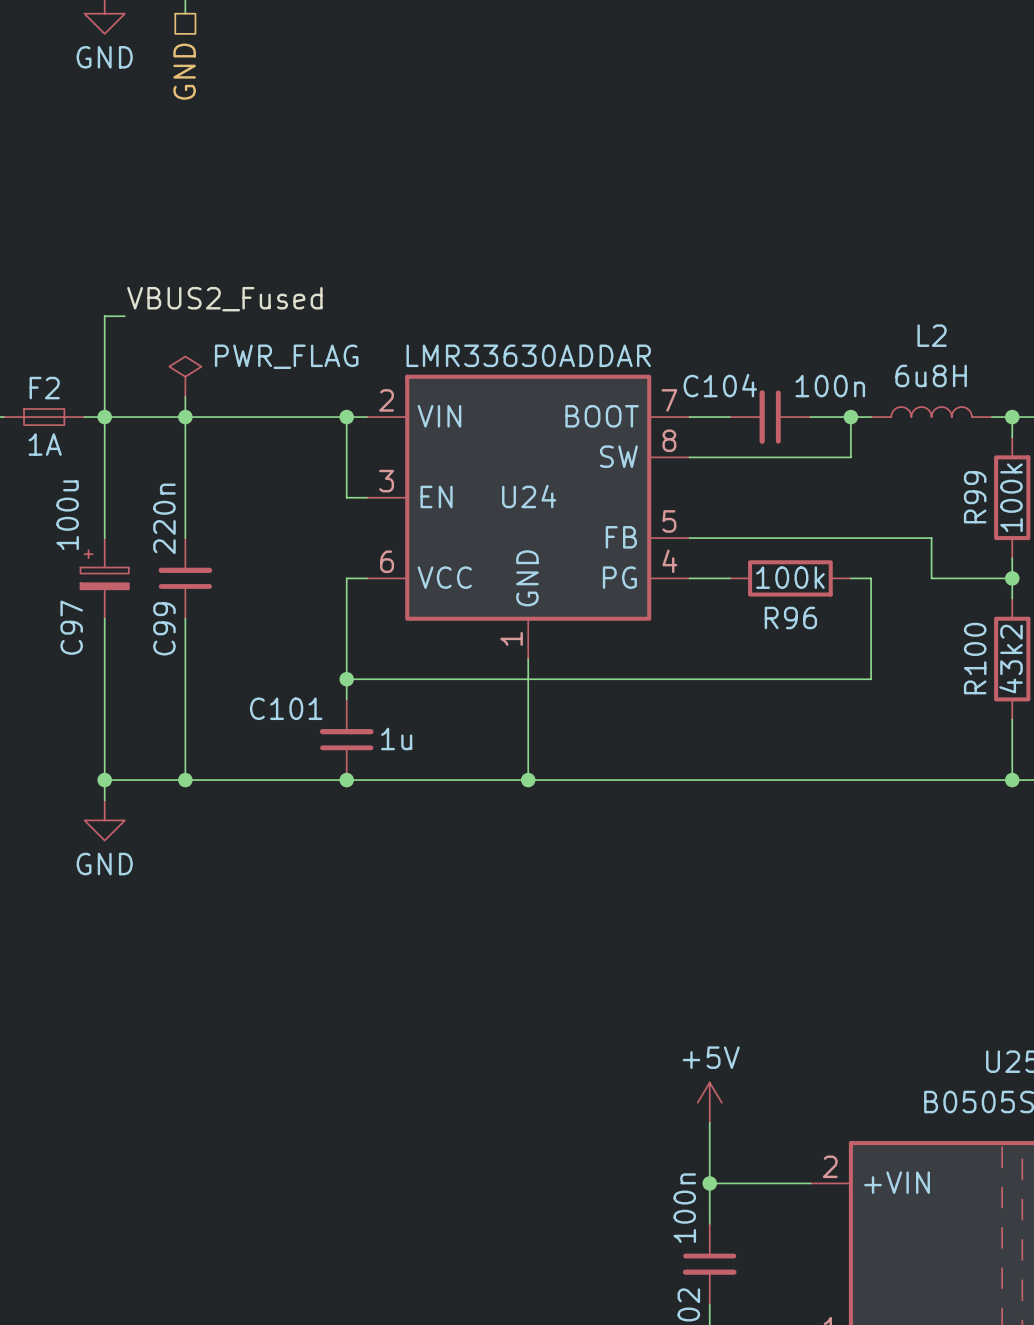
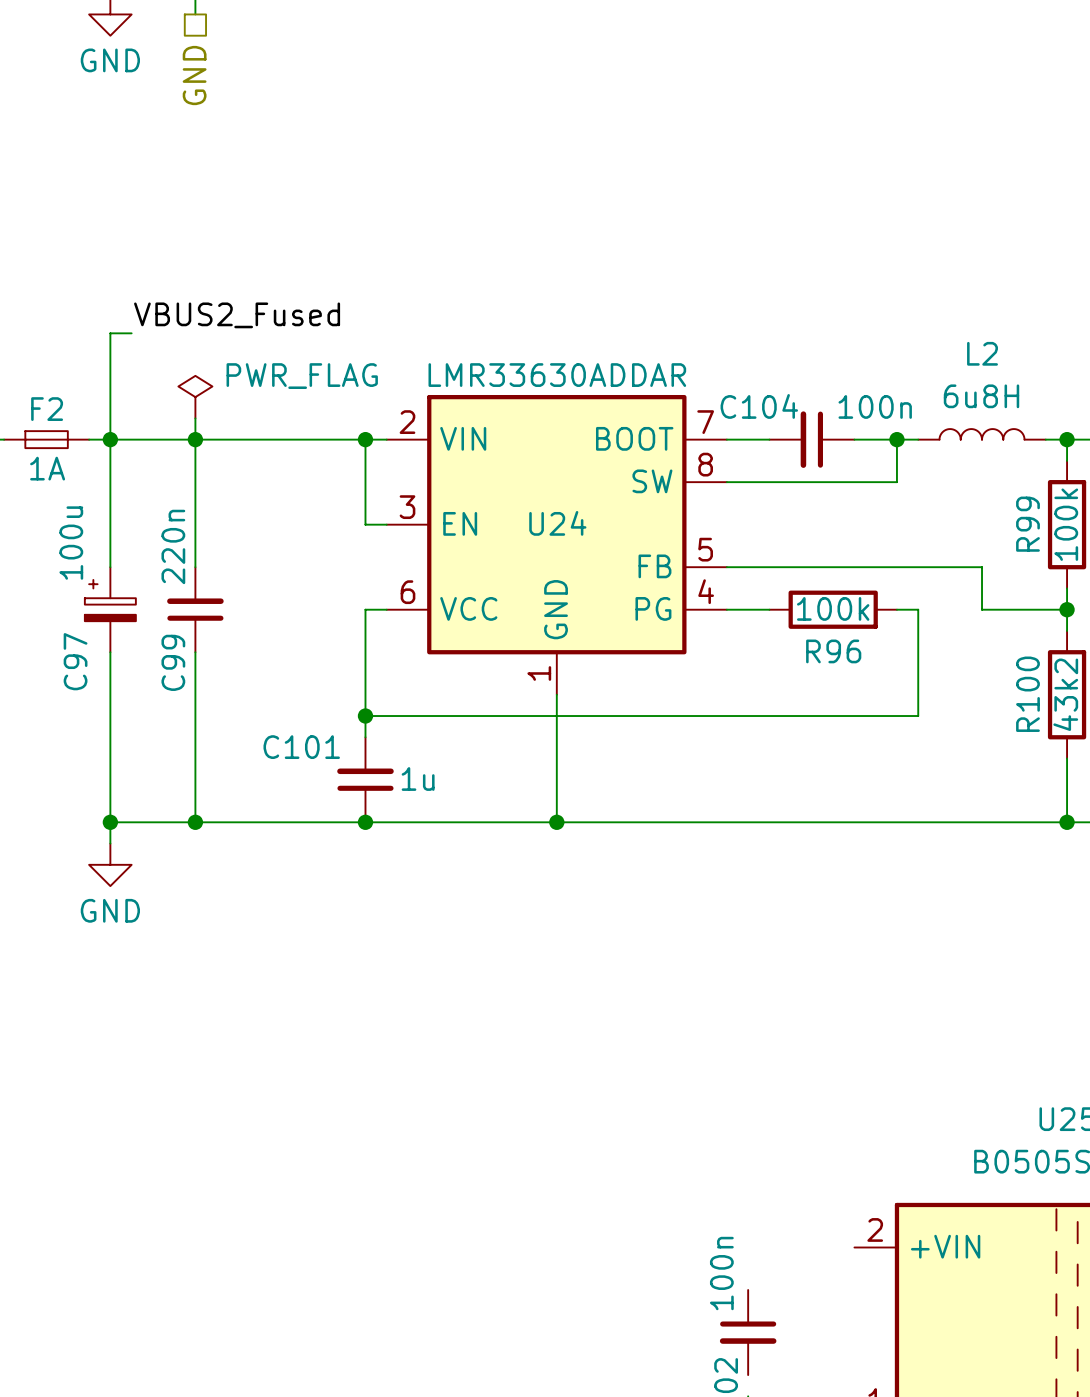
power symbol: +5V (709, 1102) -> none
wire: (709, 1122) (709, 1223) -> none
wire: (709, 1183) (810, 1183) -> none
junction: (709, 1183) -> none
wire: (709, 1304) (709, 1324) -> none

